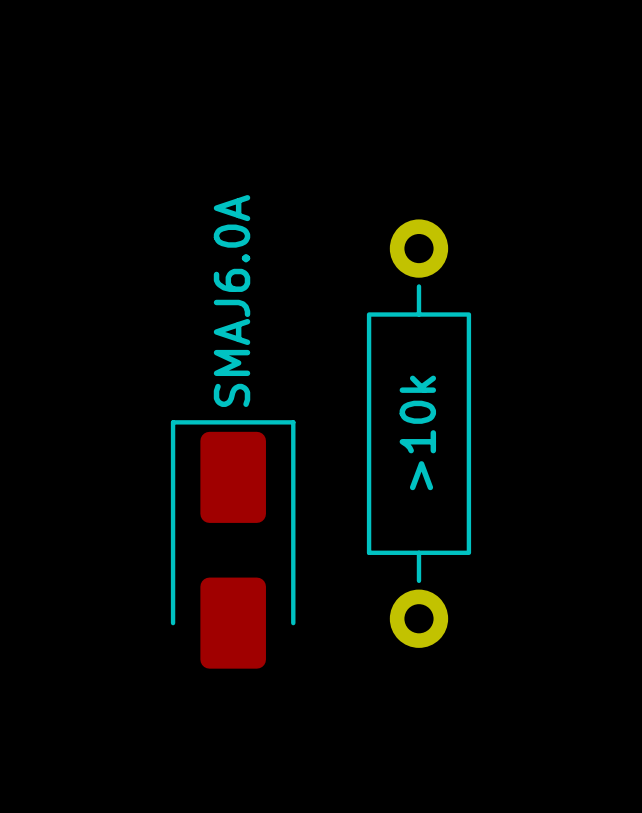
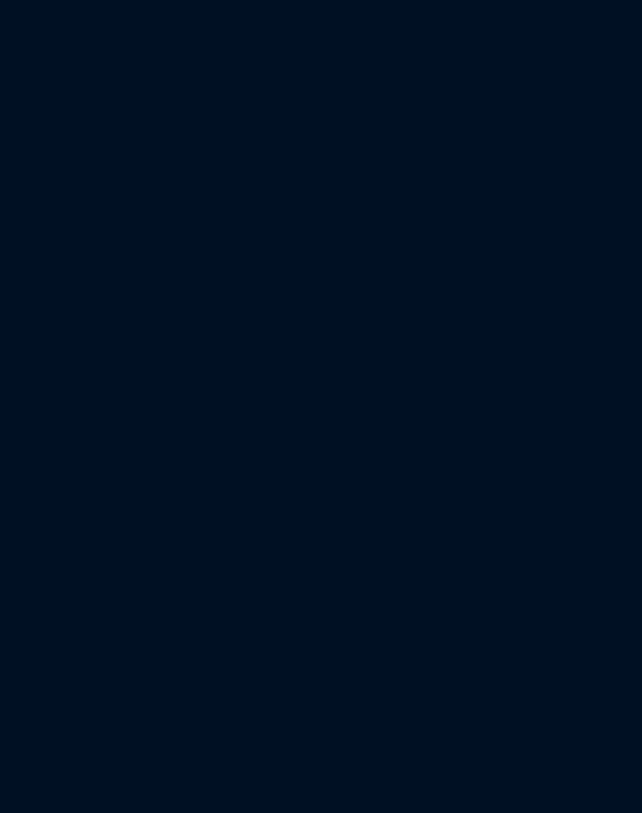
part: >10k (418, 433) -> none
part: SMAJ6.0A (233, 544) -> none

